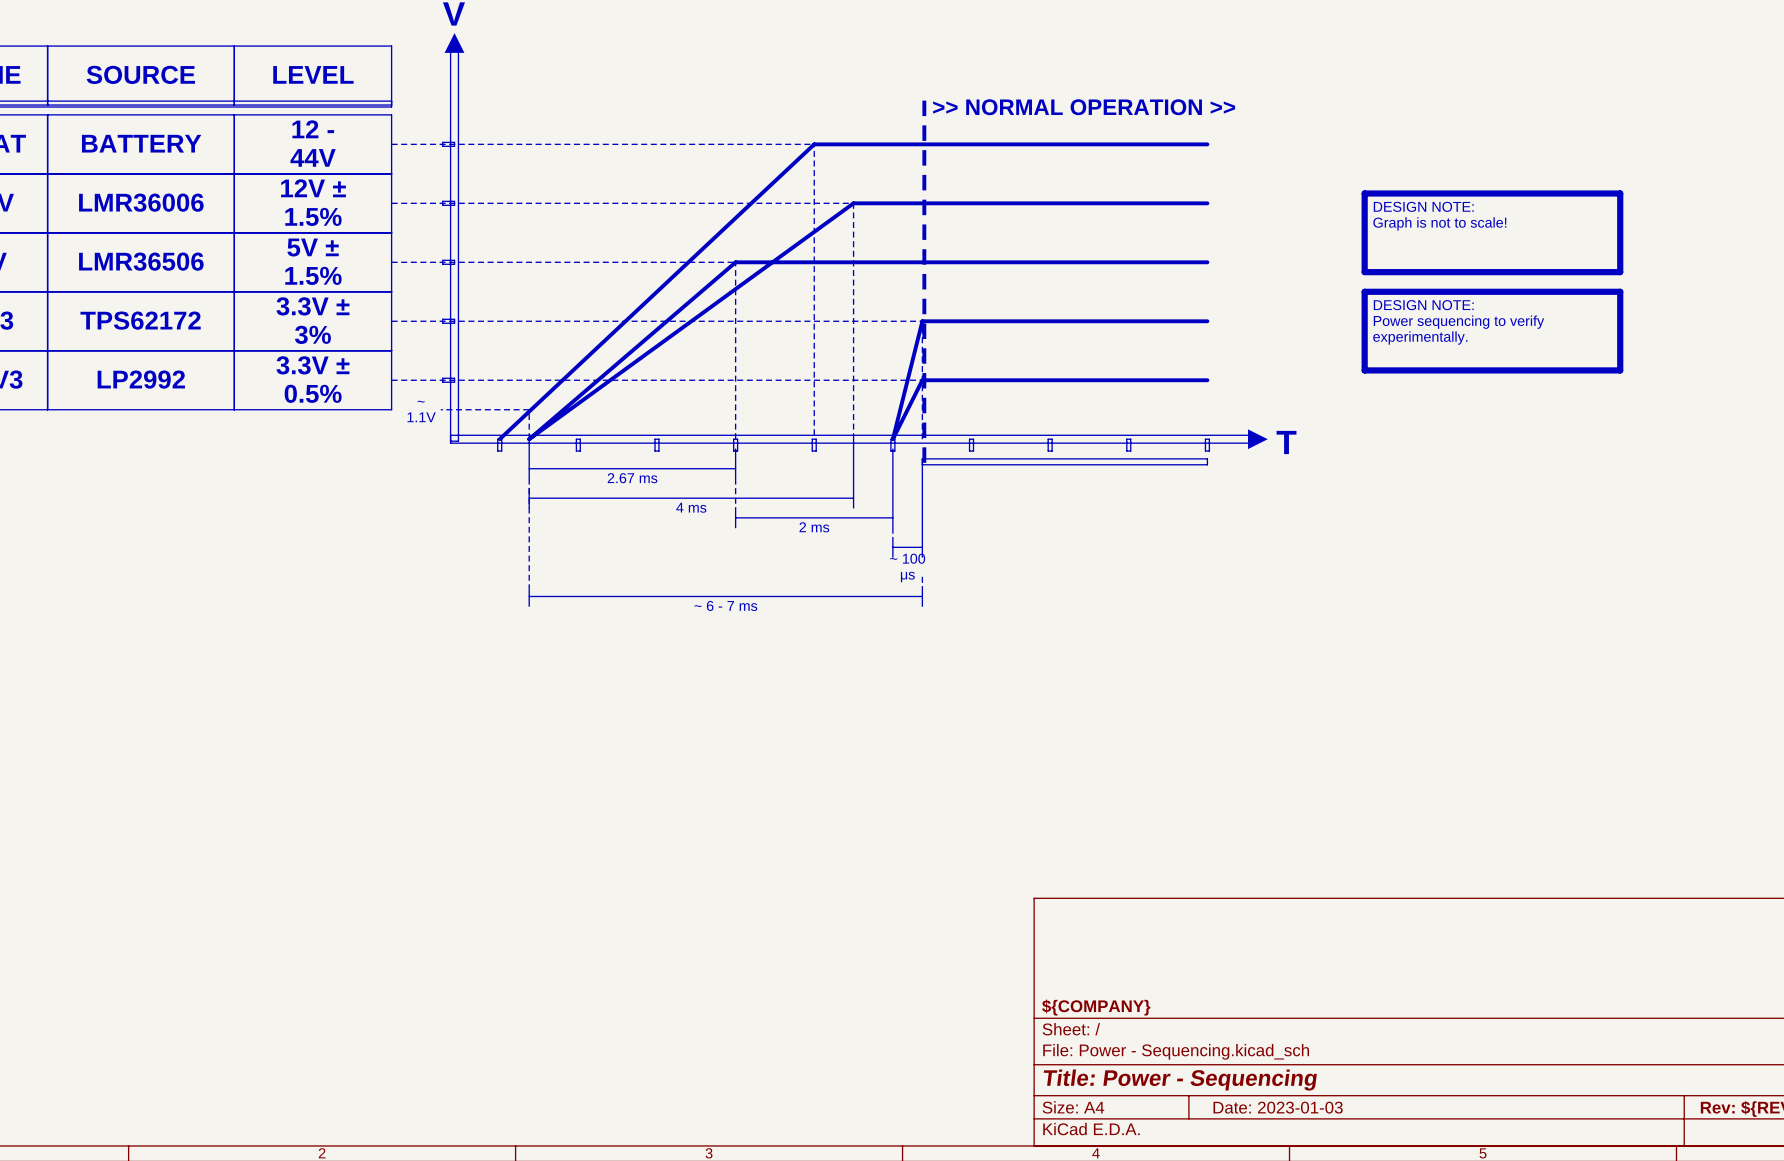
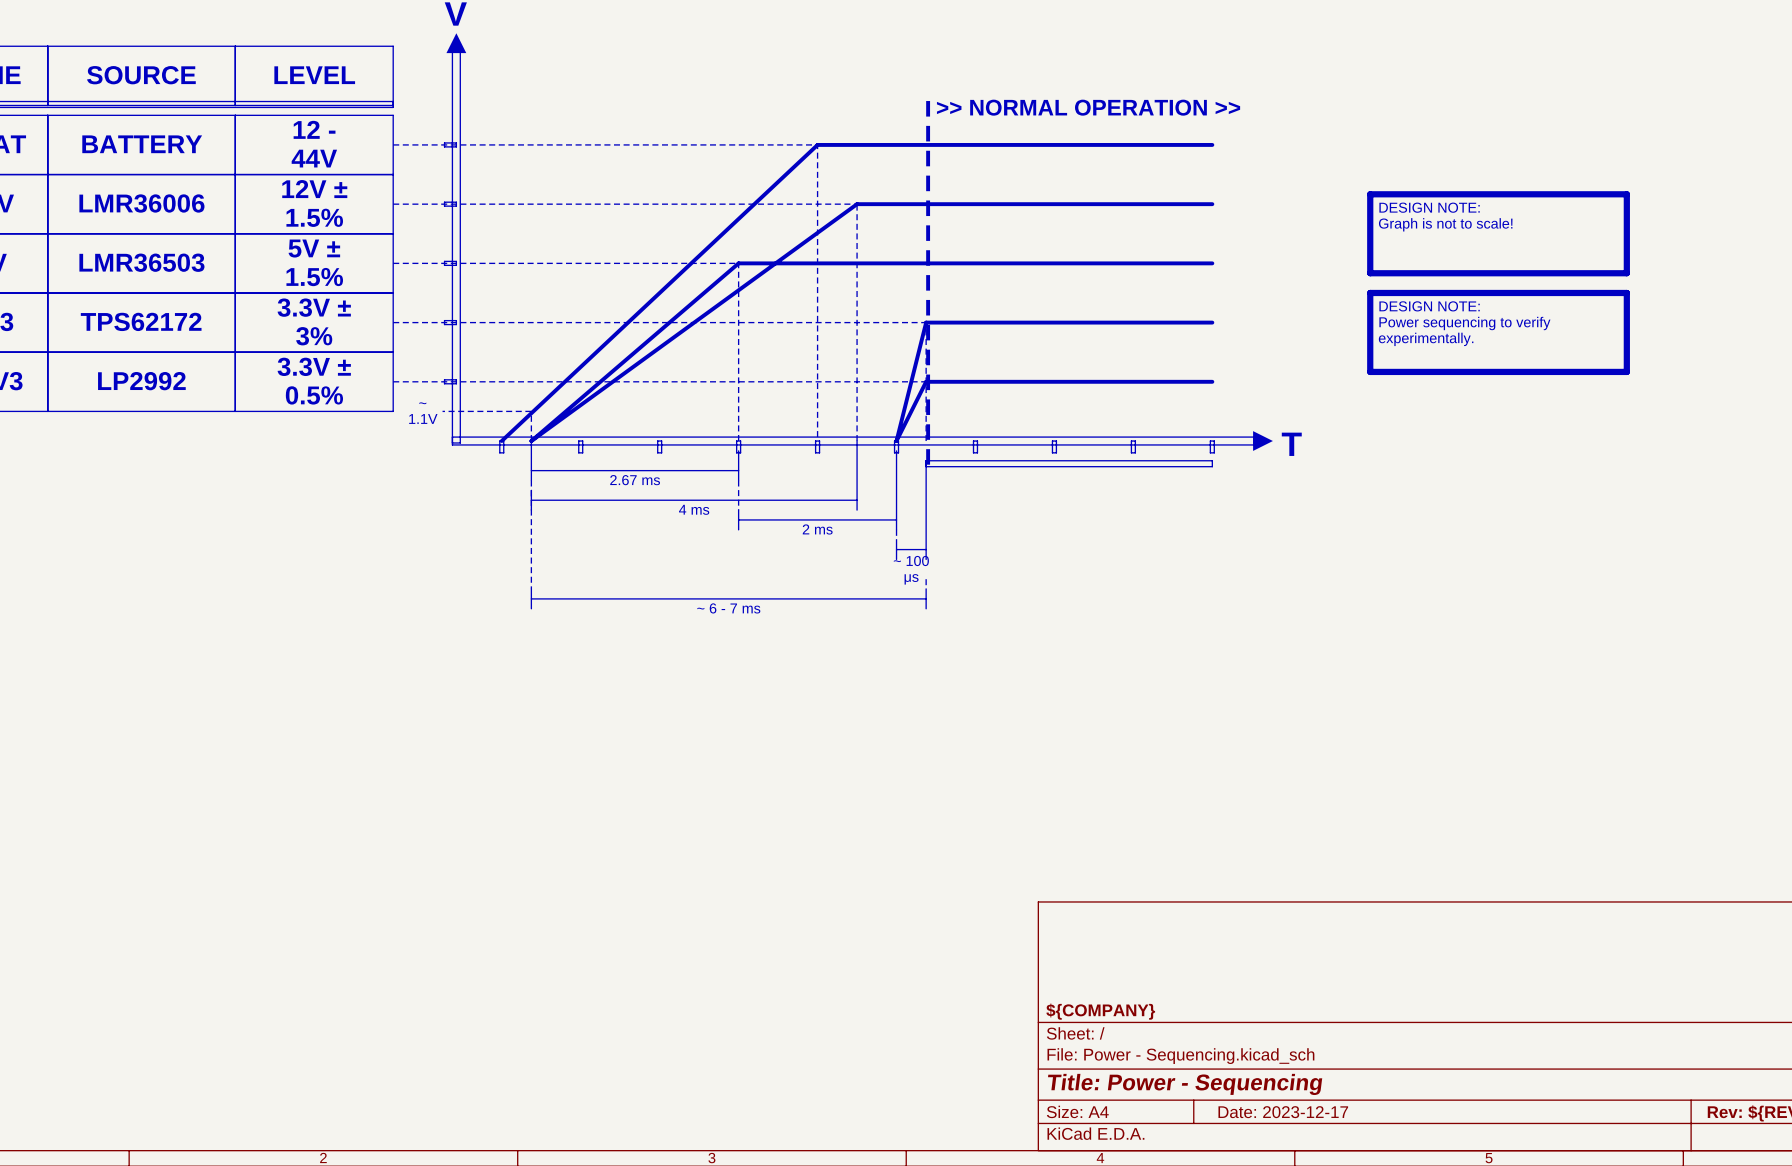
text: LMR36506 (141, 261) -> LMR36503 (141, 262)
title block: Date: 2023-01-03 (1278, 1107) -> Date: 2023-12-17 (1283, 1112)

